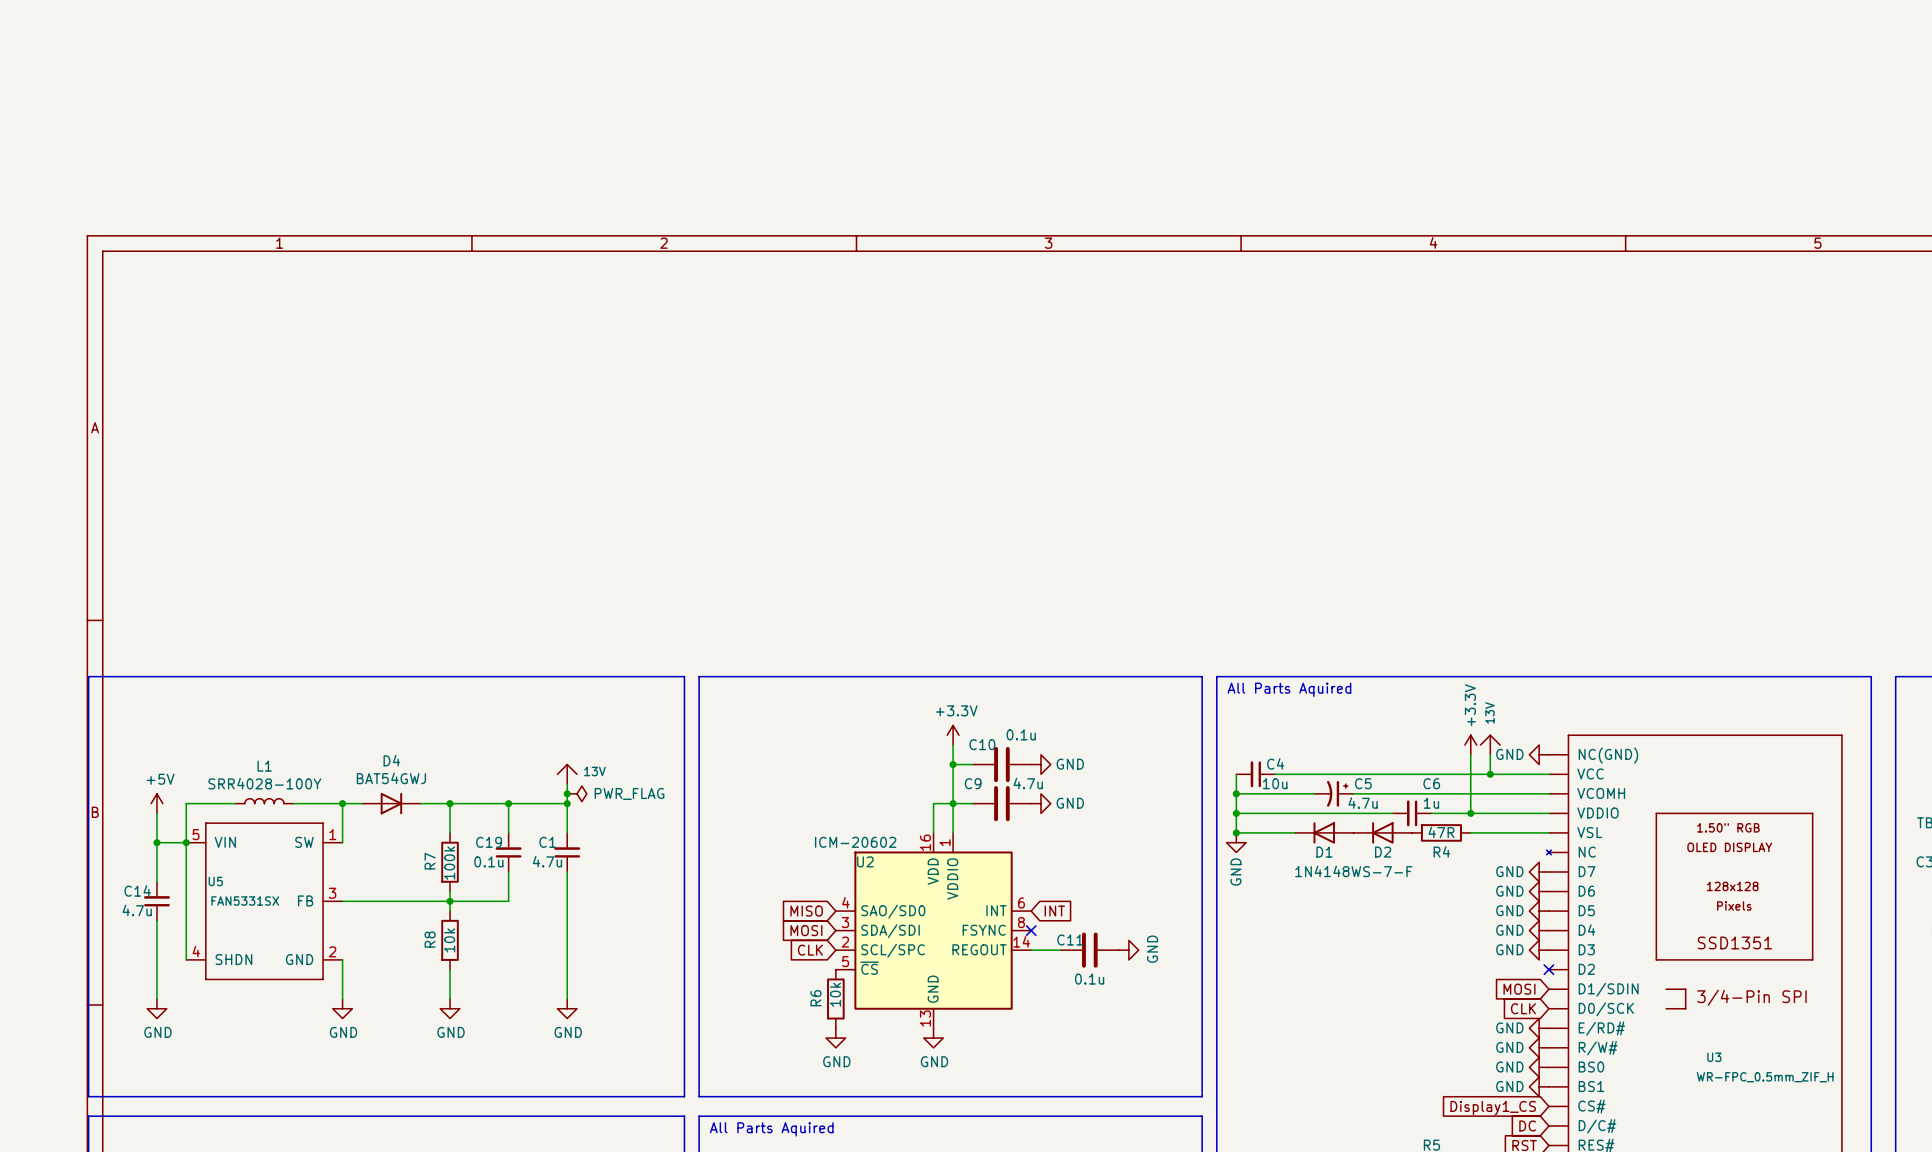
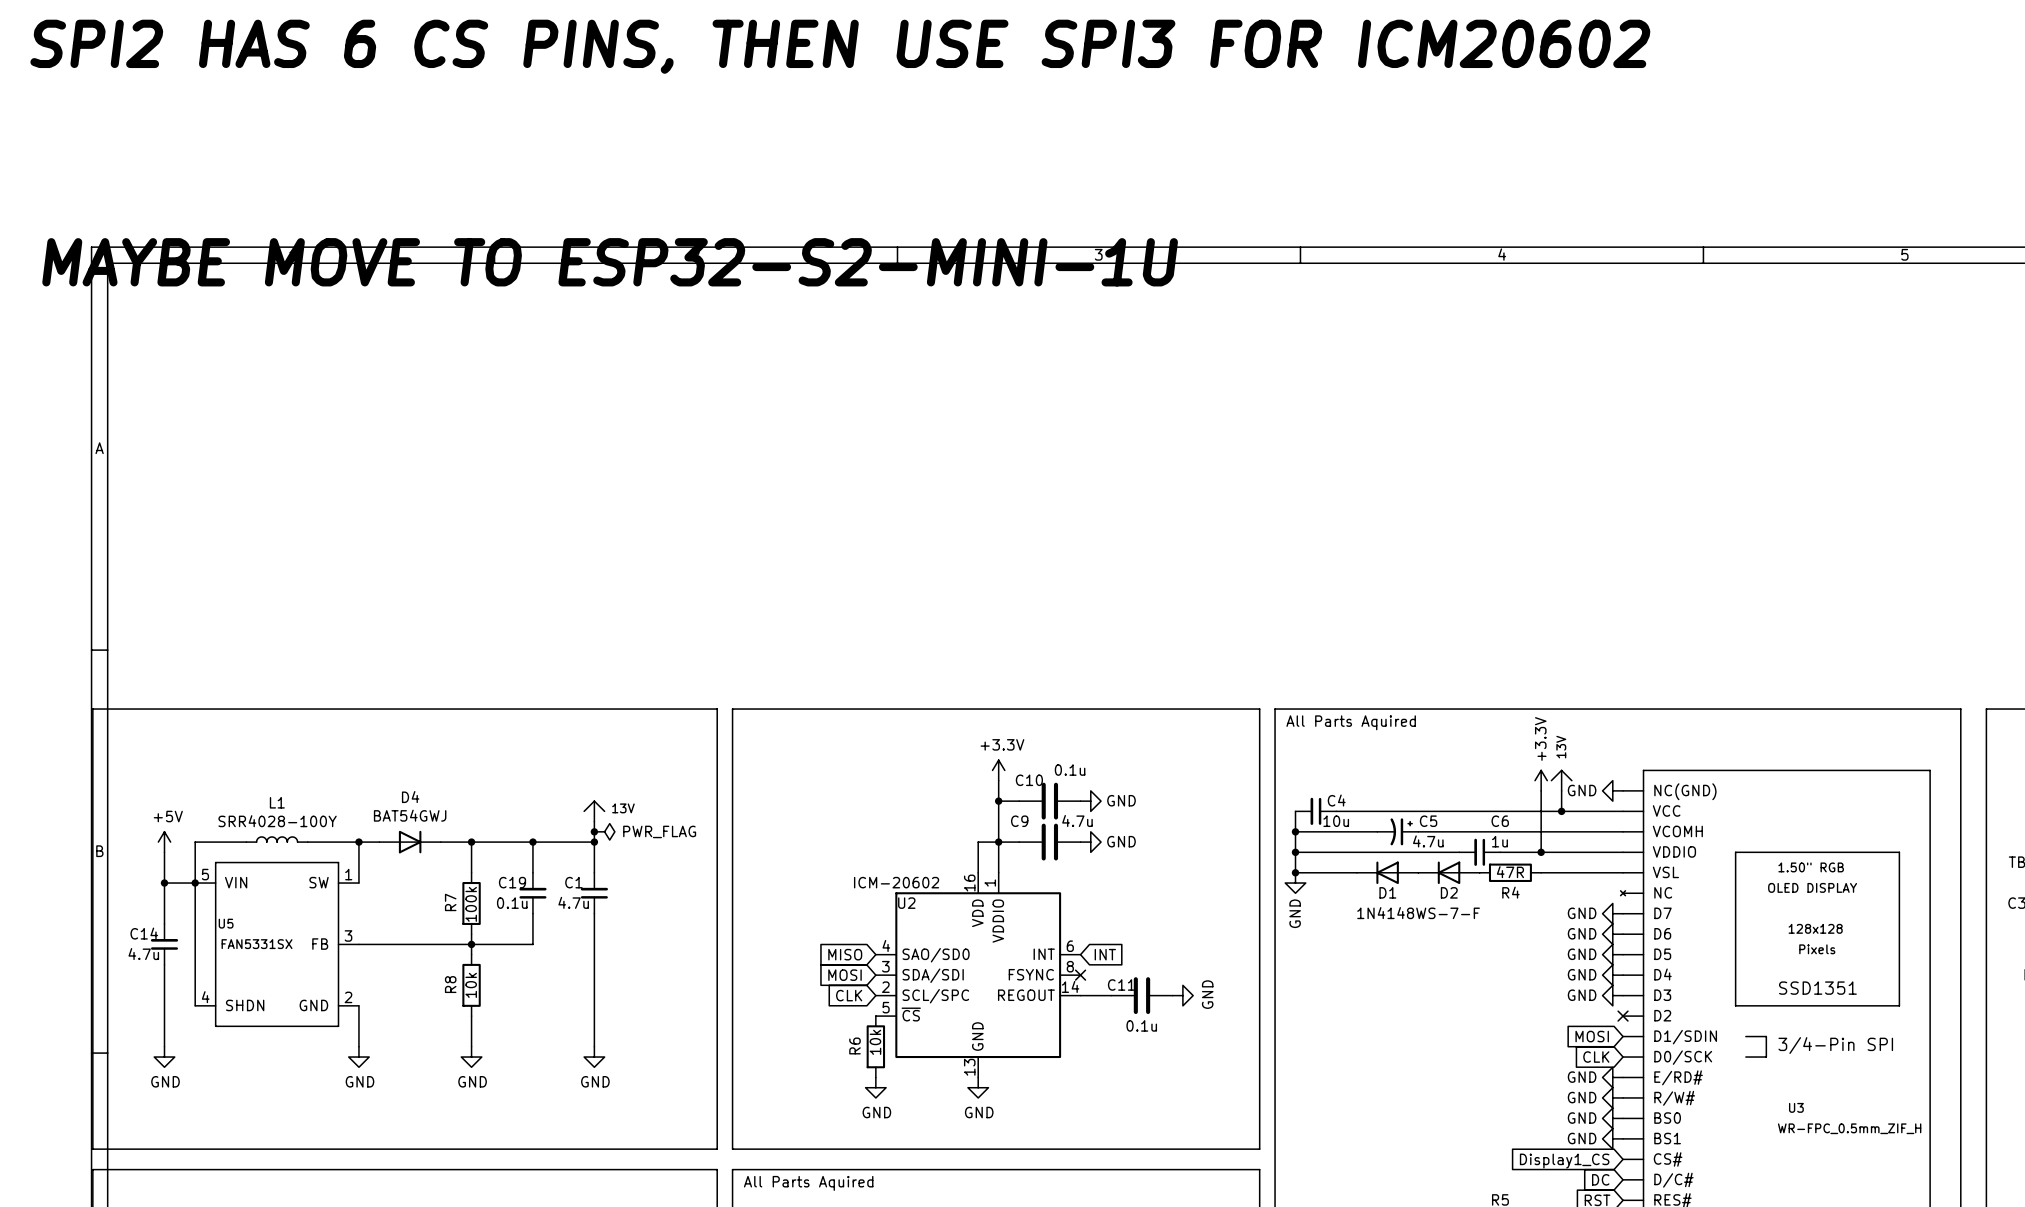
text: none -> SPI2 HAS 6 CS PINS, THEN USE SPI3 FOR ICM20602 (840, 46)
text: none -> MAYBE MOVE TO ESP32-S2-MINI-1U (610, 262)

